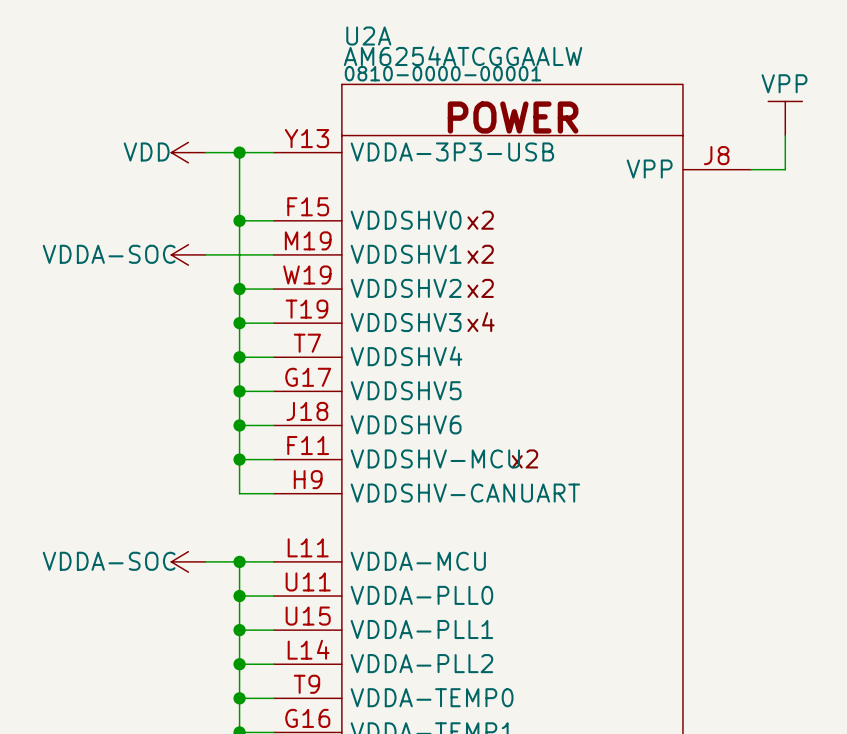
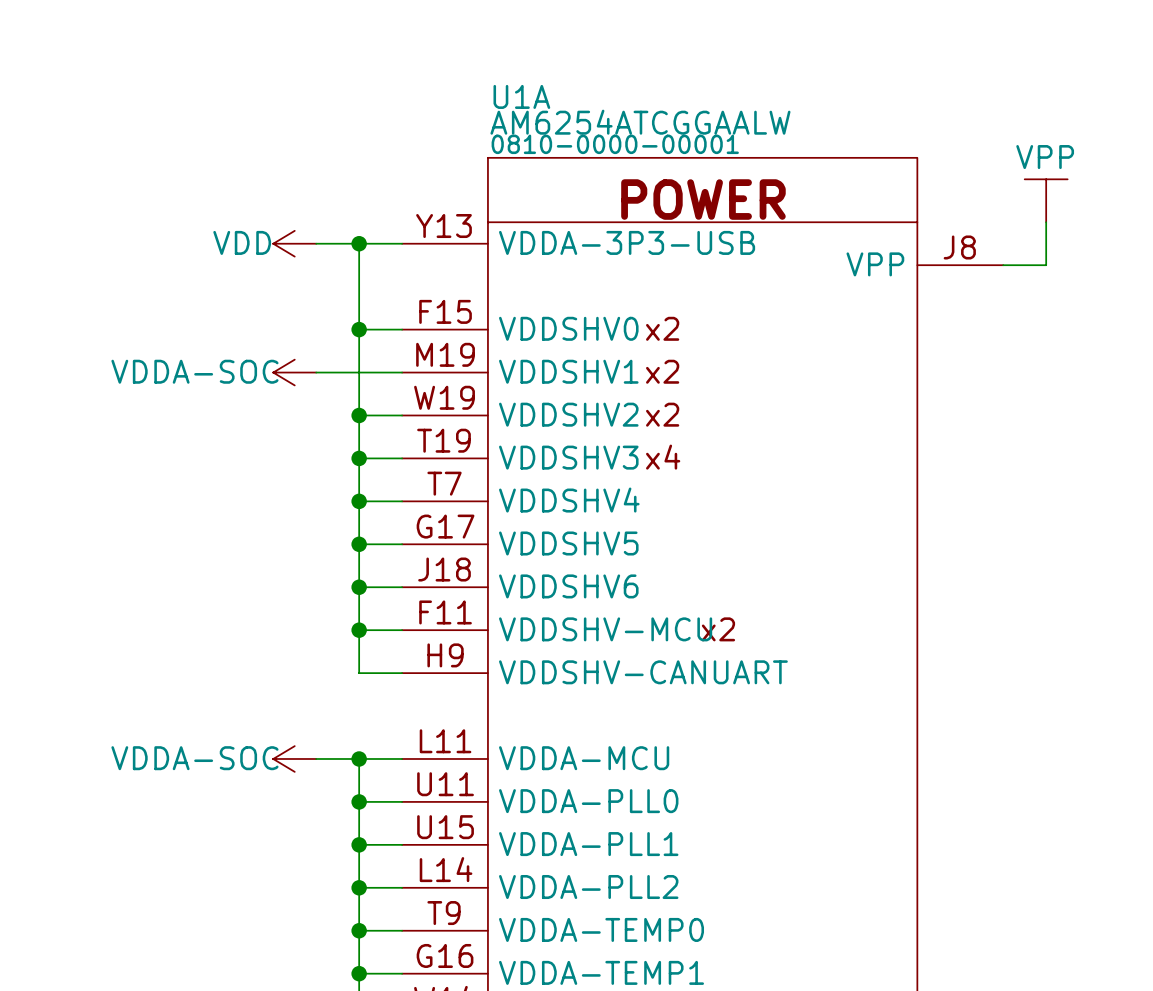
U2A name: U2A (368, 36) -> U1A (521, 96)

